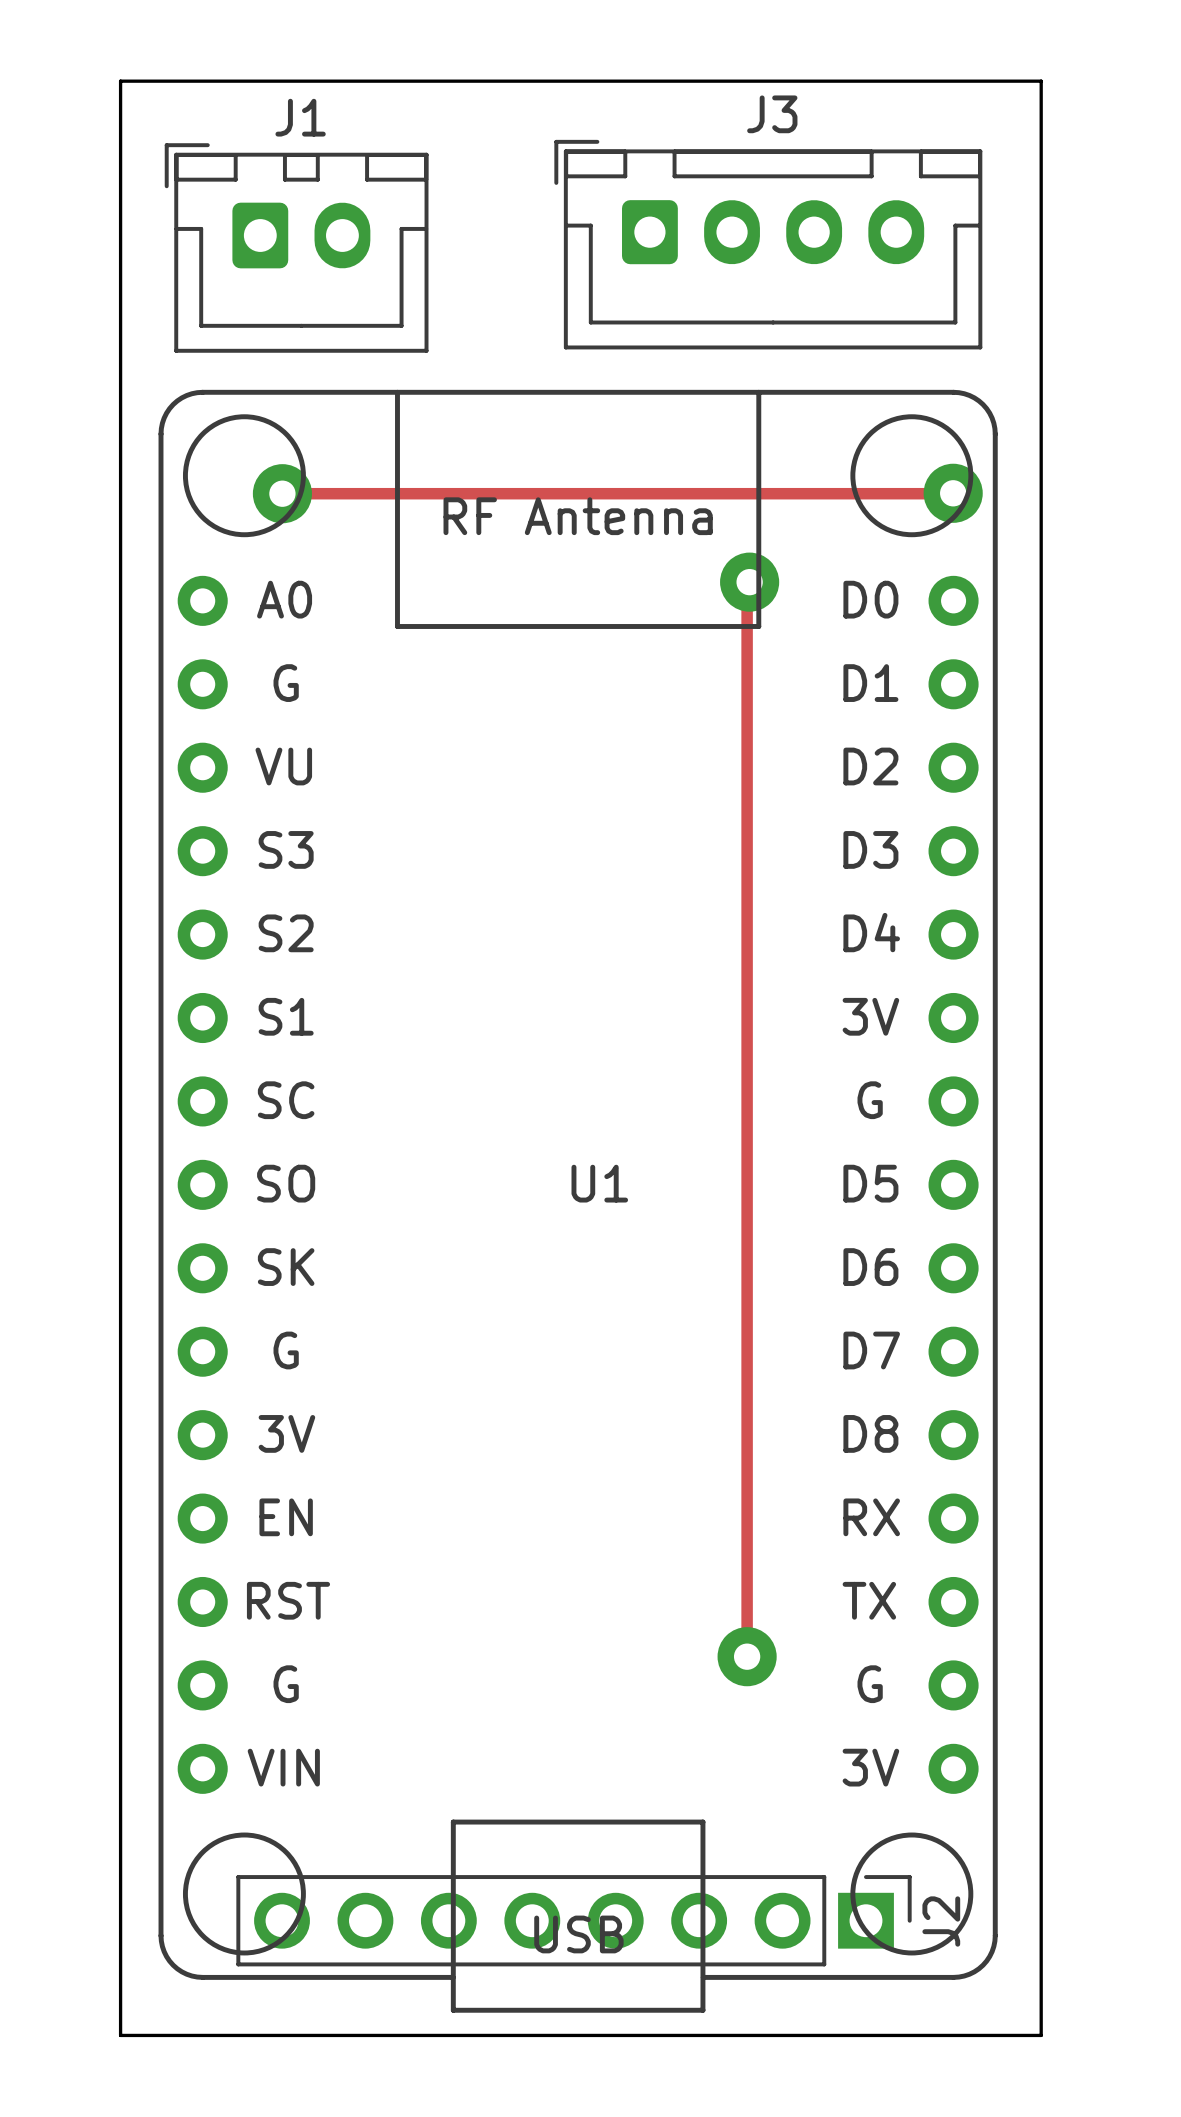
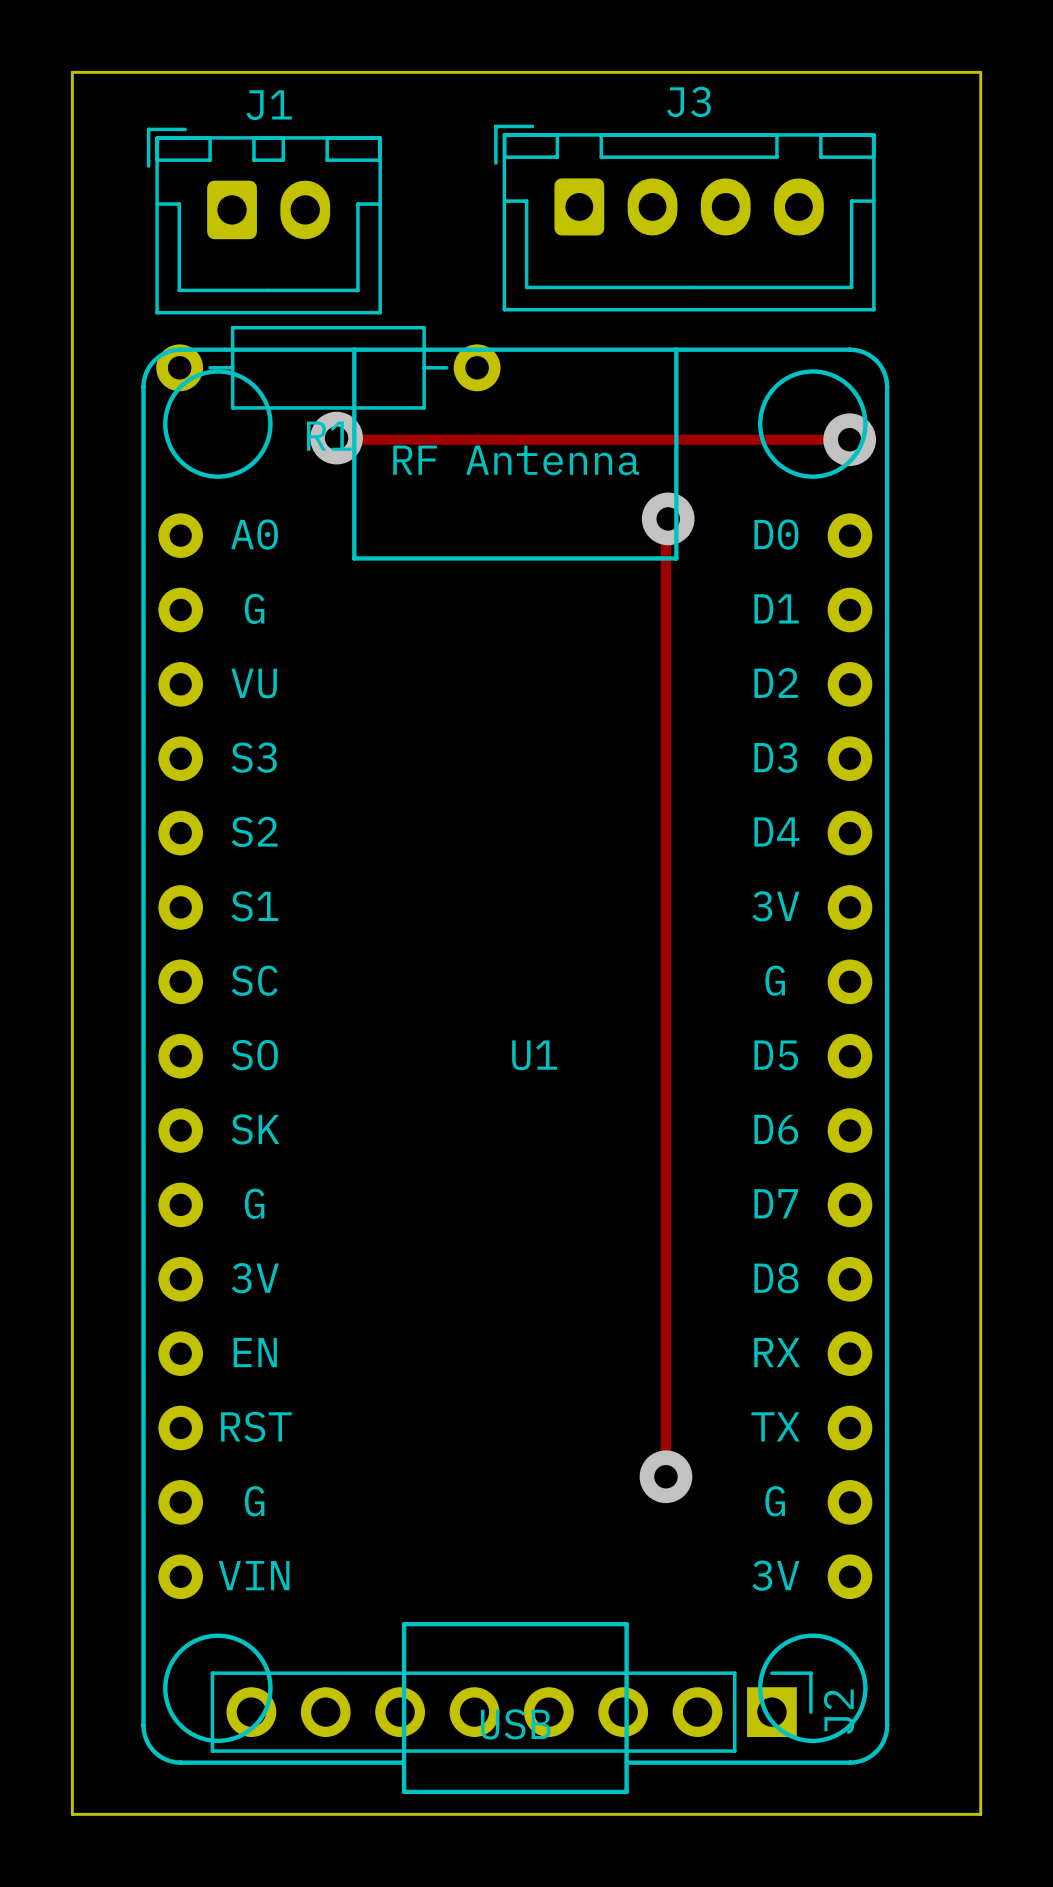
board edge: (120, 81) (120, 2035) -> (107, 72) (72, 72) (72, 1814) (107, 1814)
board edge: (1041, 81) (1041, 2035) -> (928, 72) (980, 72) (980, 1814) (928, 1814)
R1: none -> (328, 367)
track: (282, 493) (952, 493) -> (336, 438) (338, 439) (849, 439)
via position: (282, 493) -> (336, 438)

